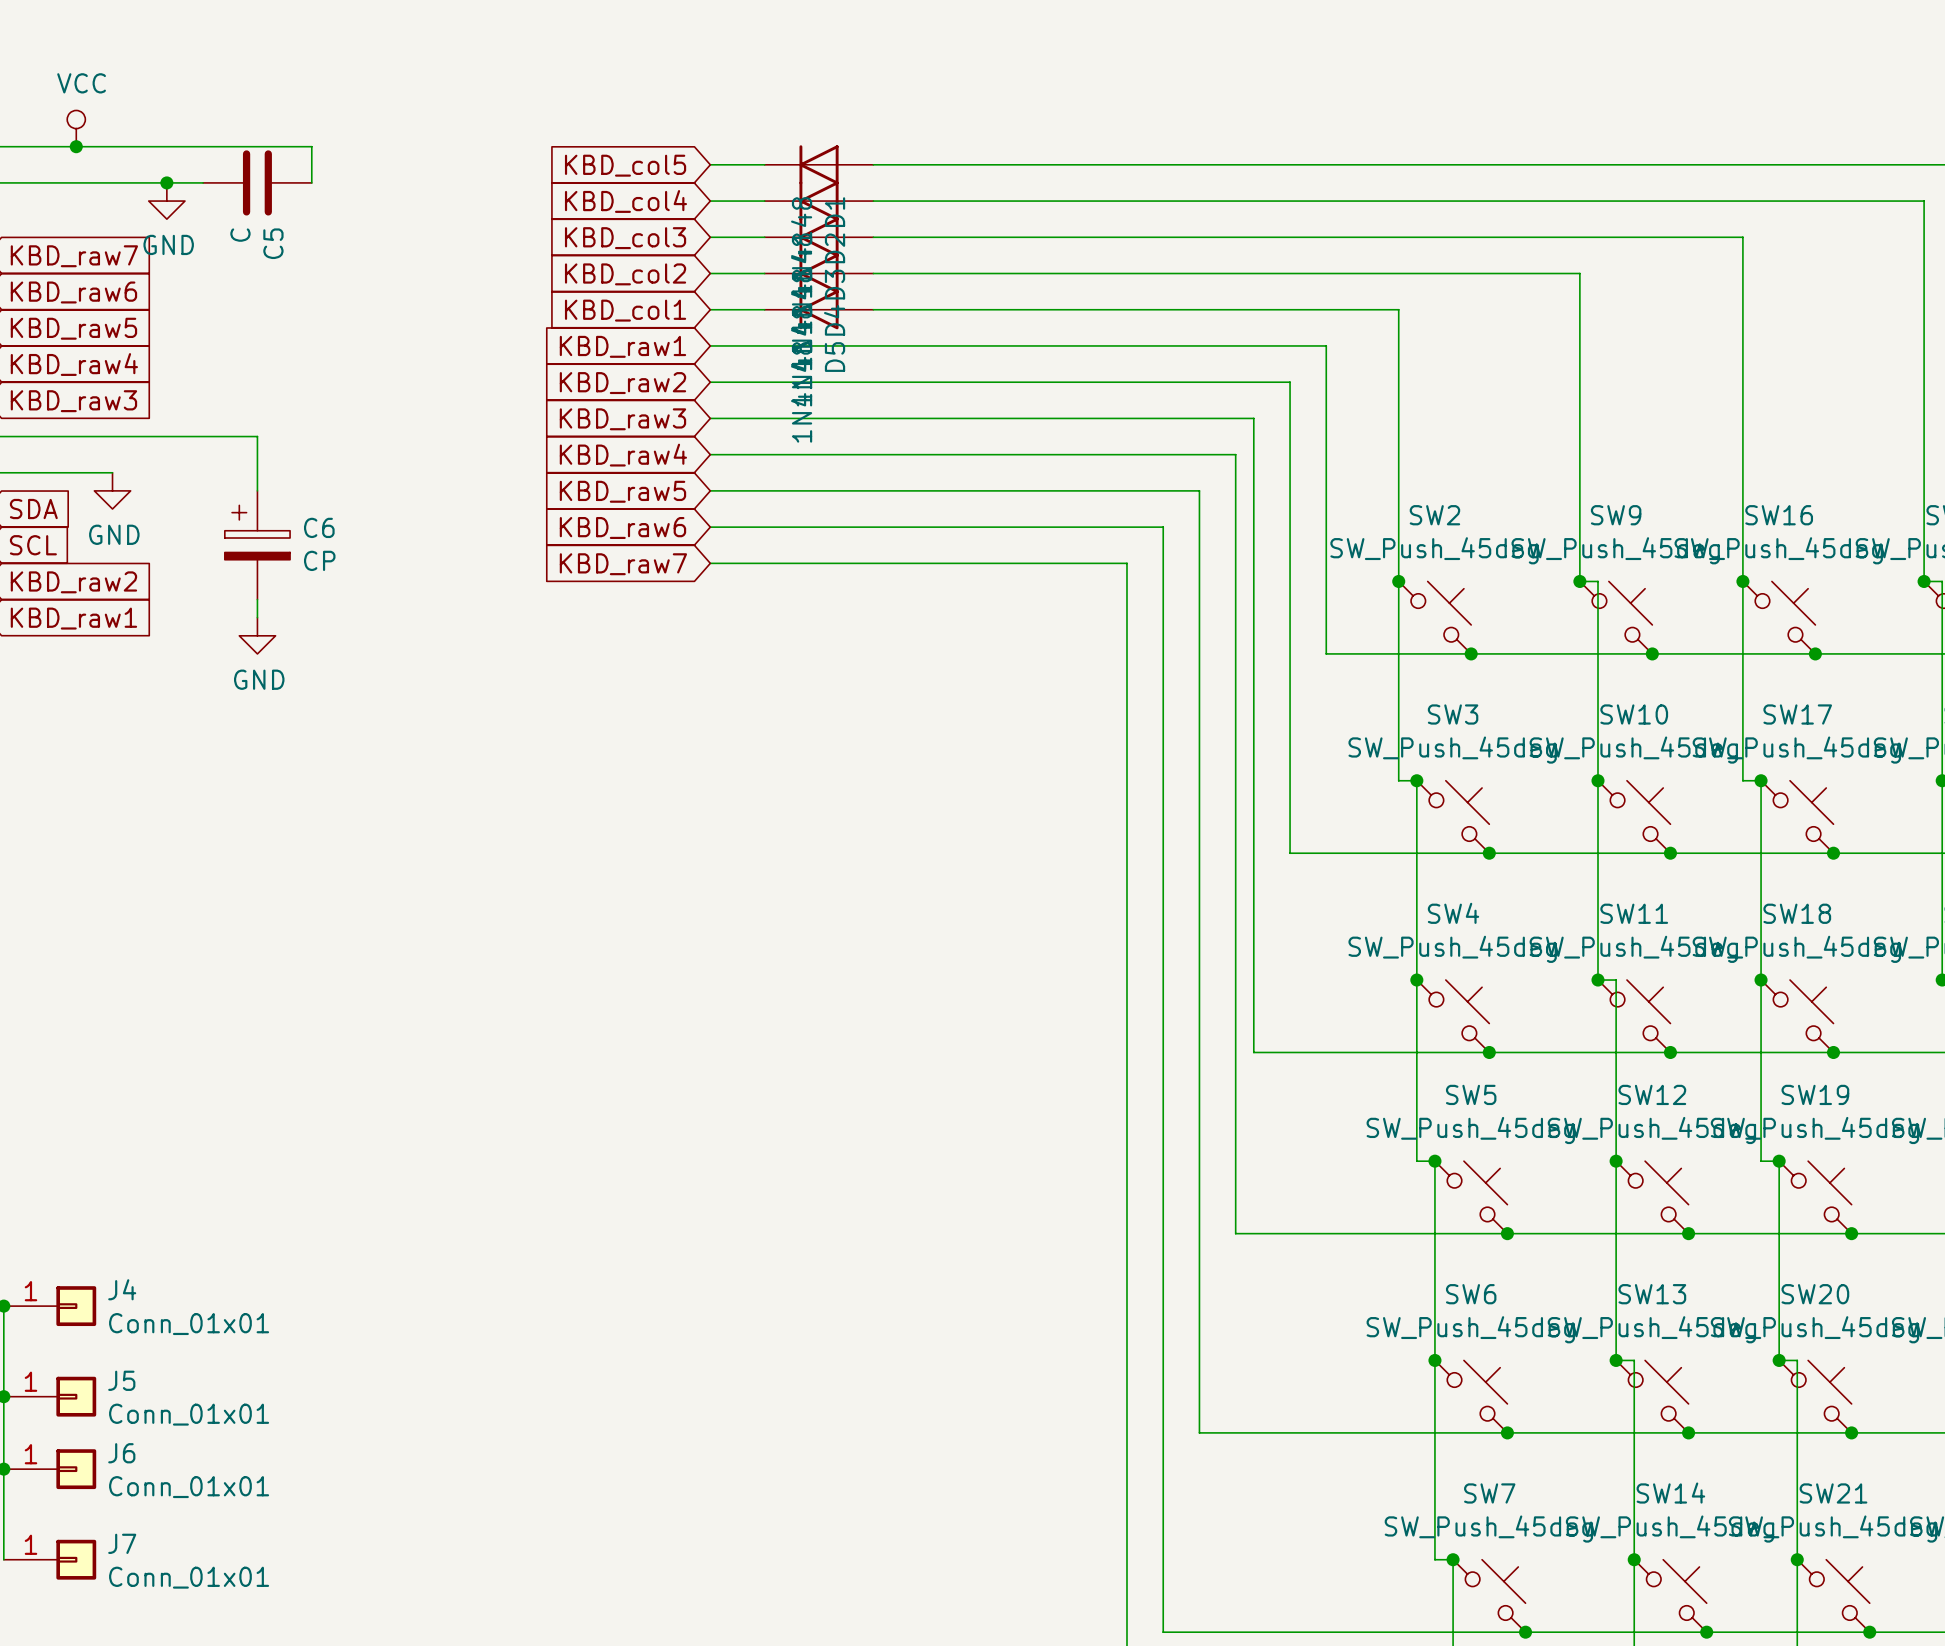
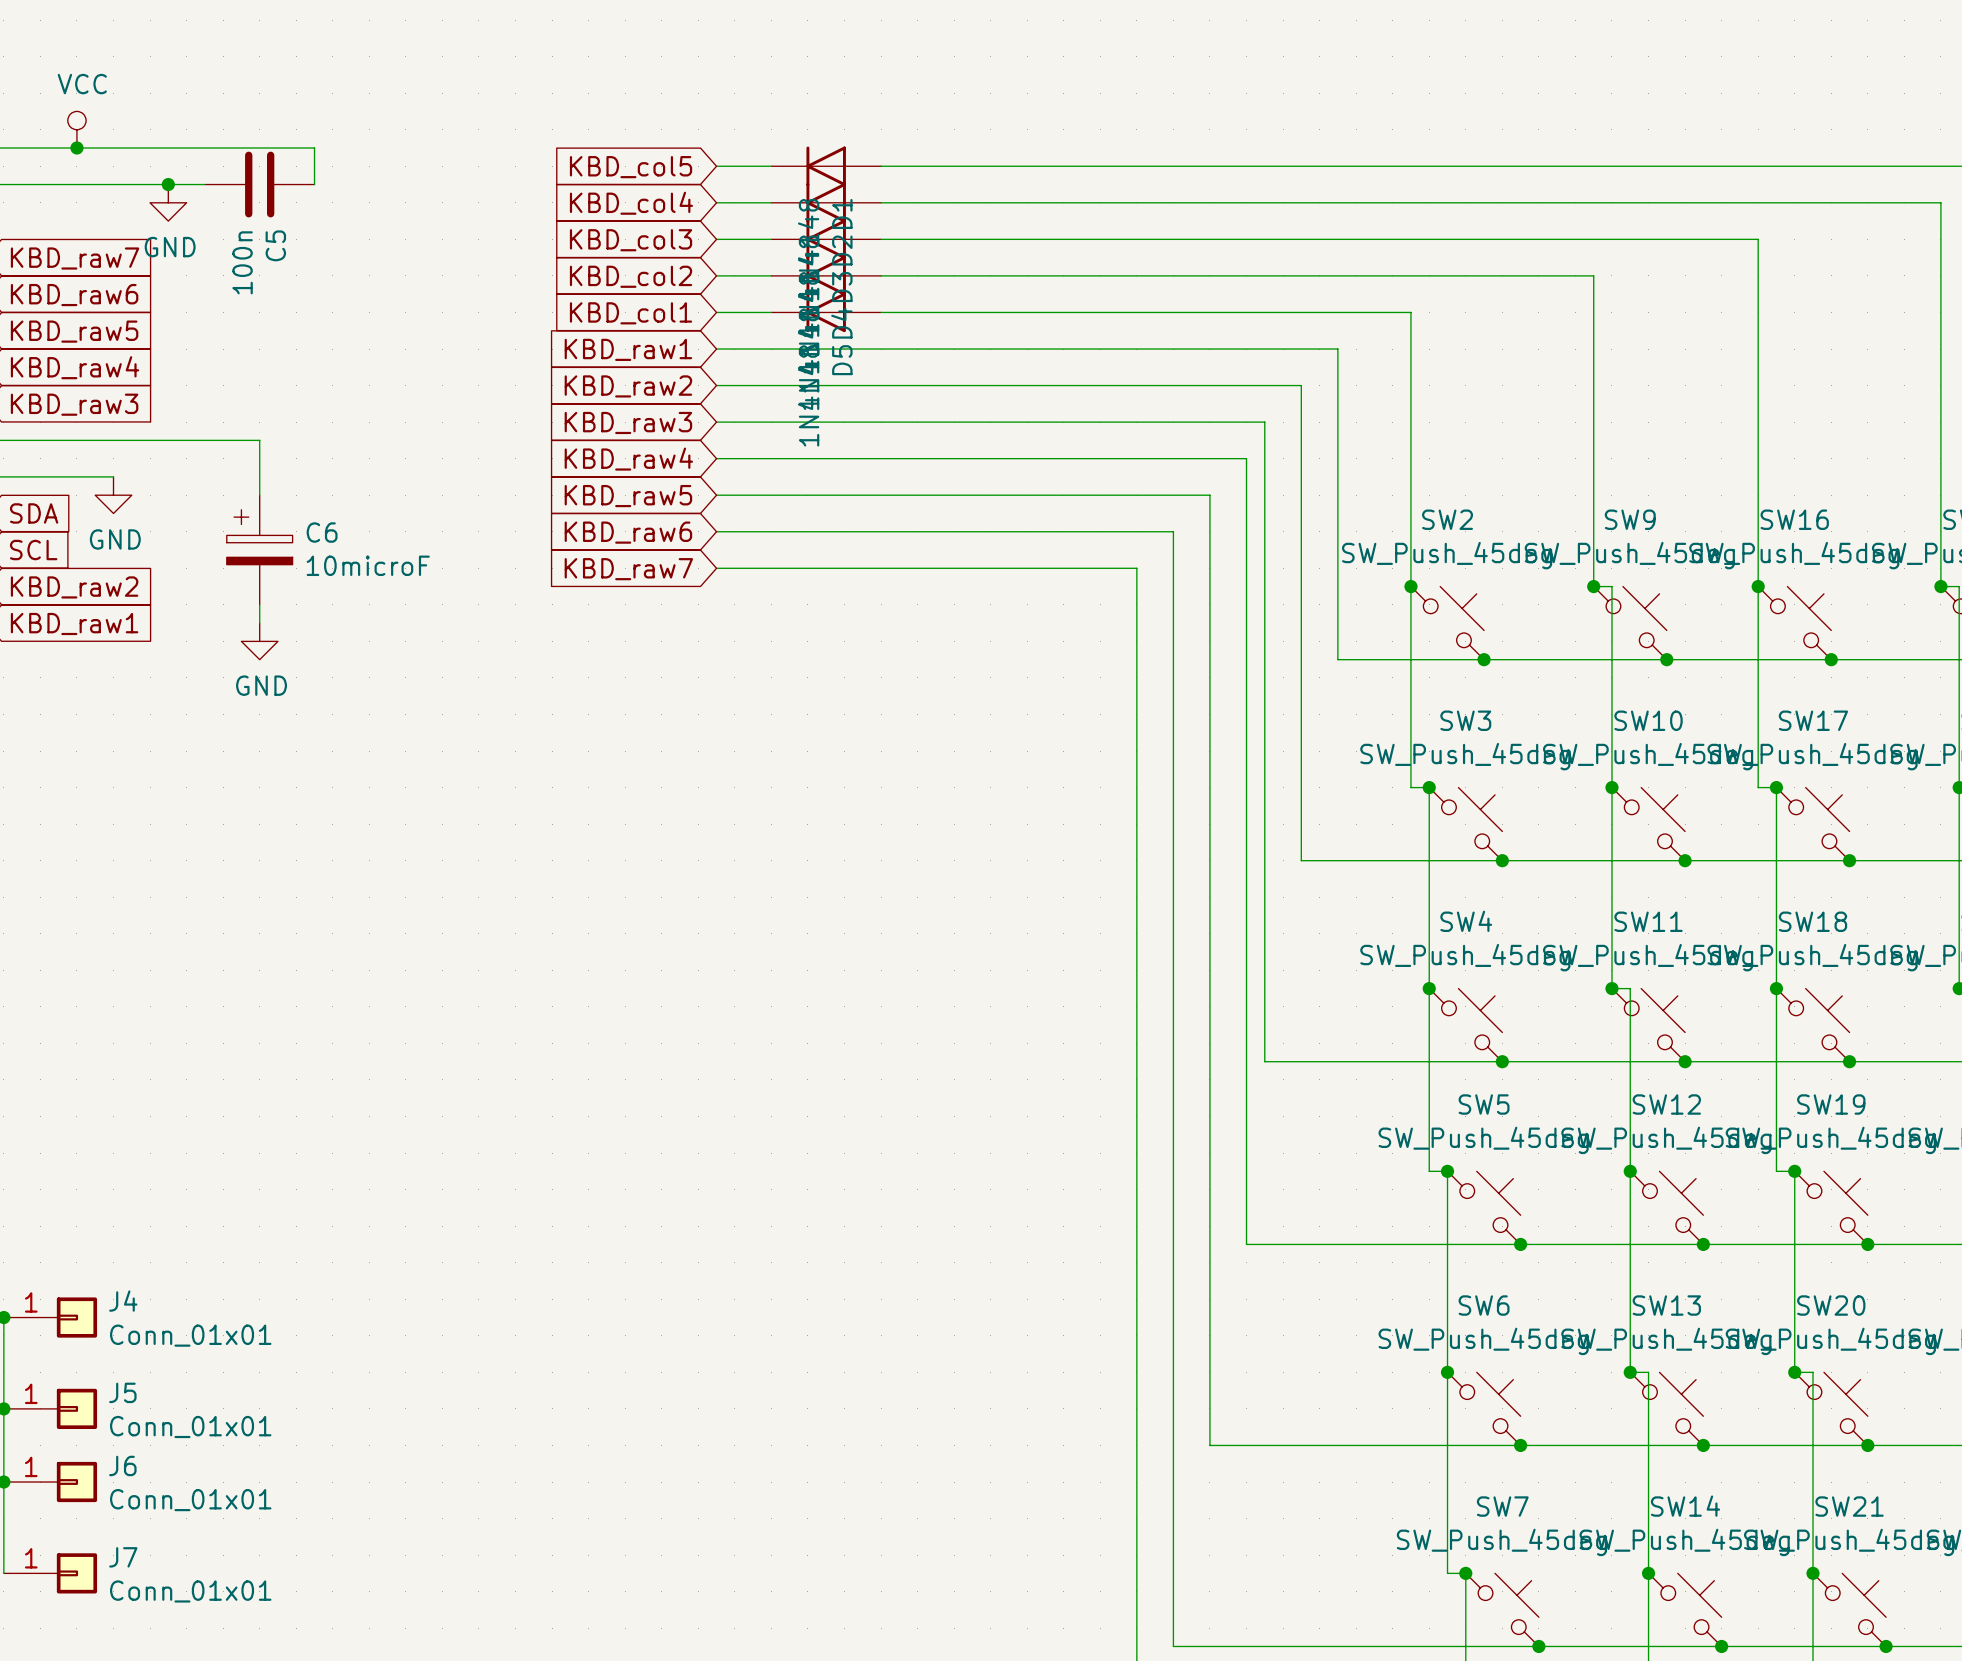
C5 value: C (240, 235) -> 100n (242, 262)
C6 value: CP (319, 560) -> 10microF (368, 565)

